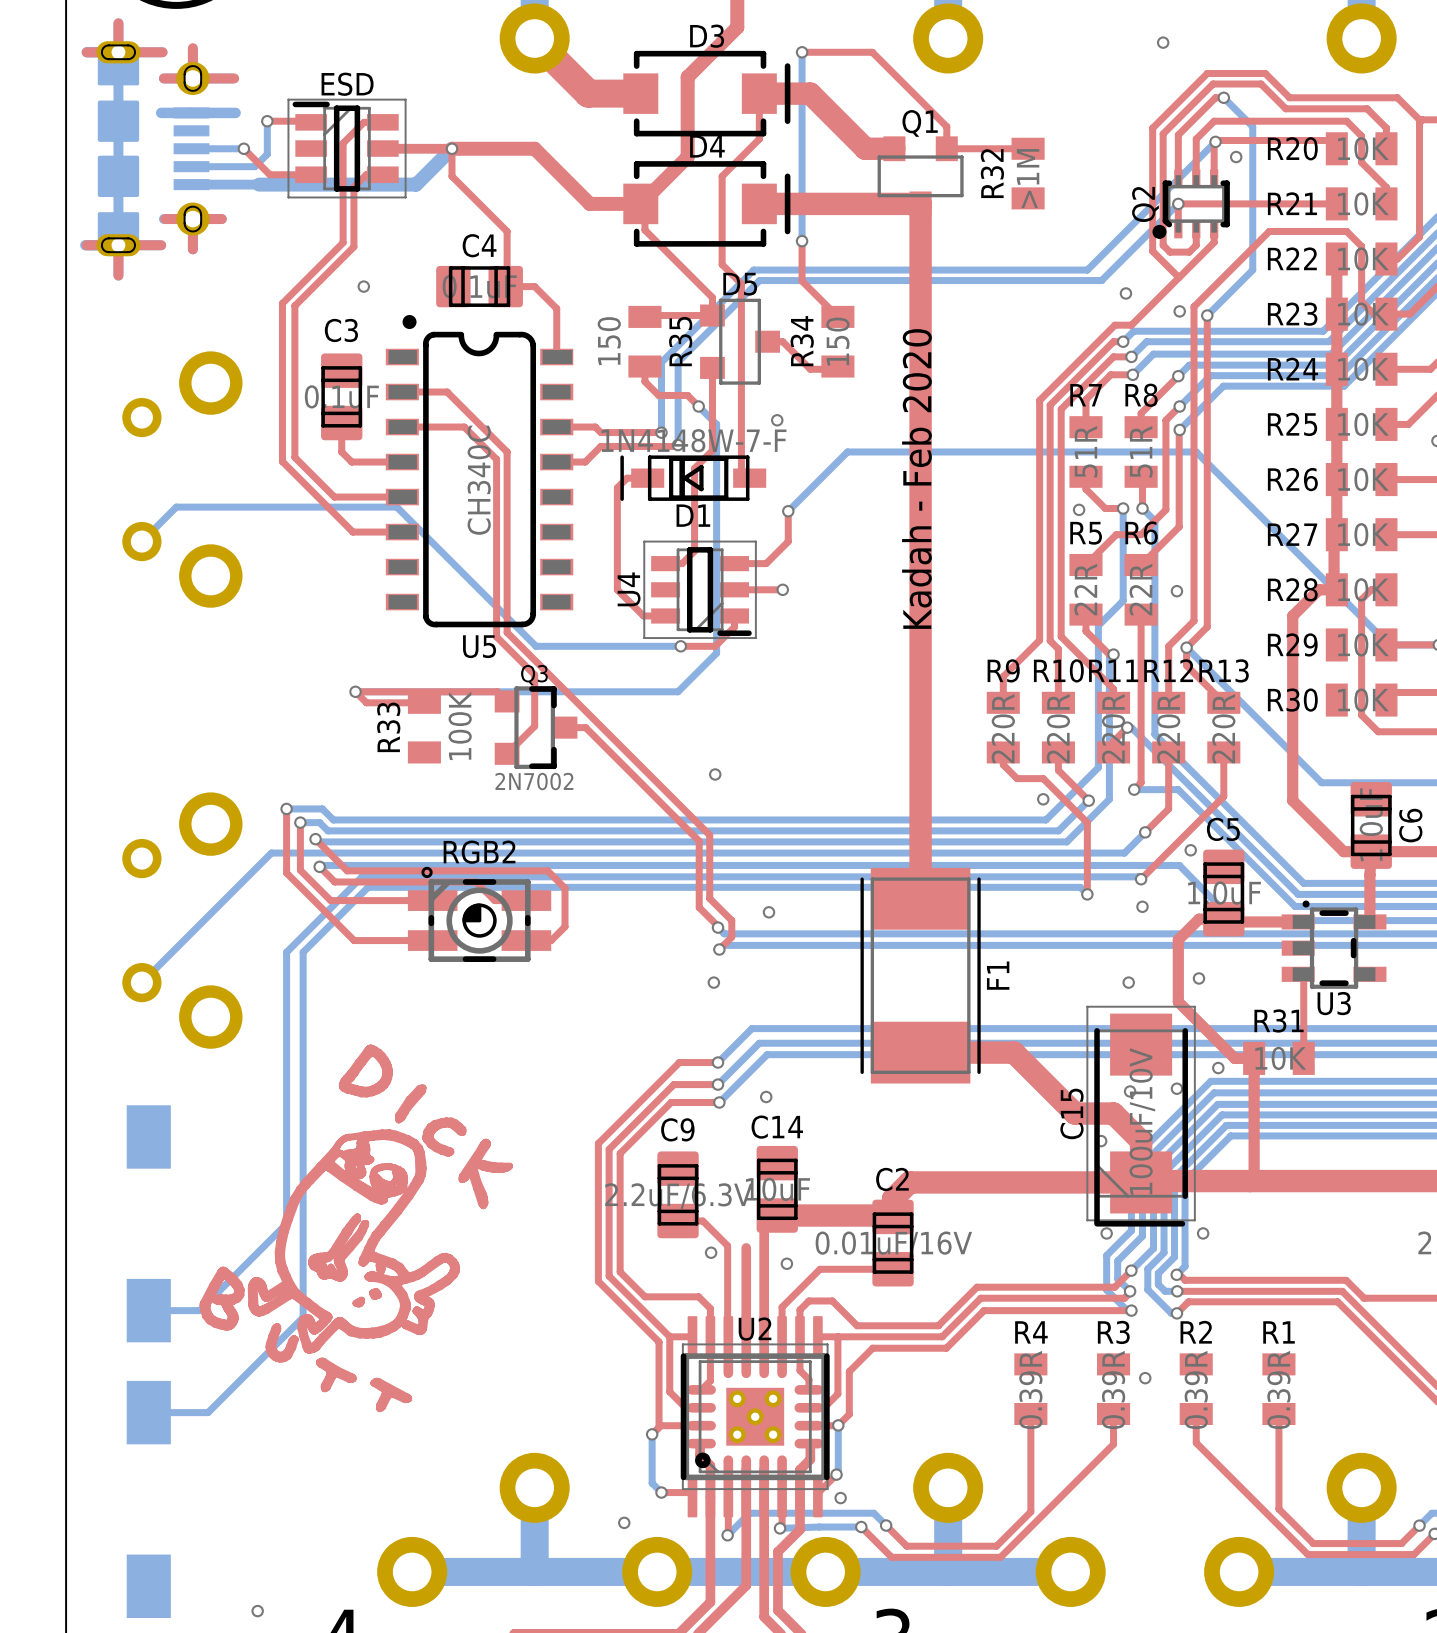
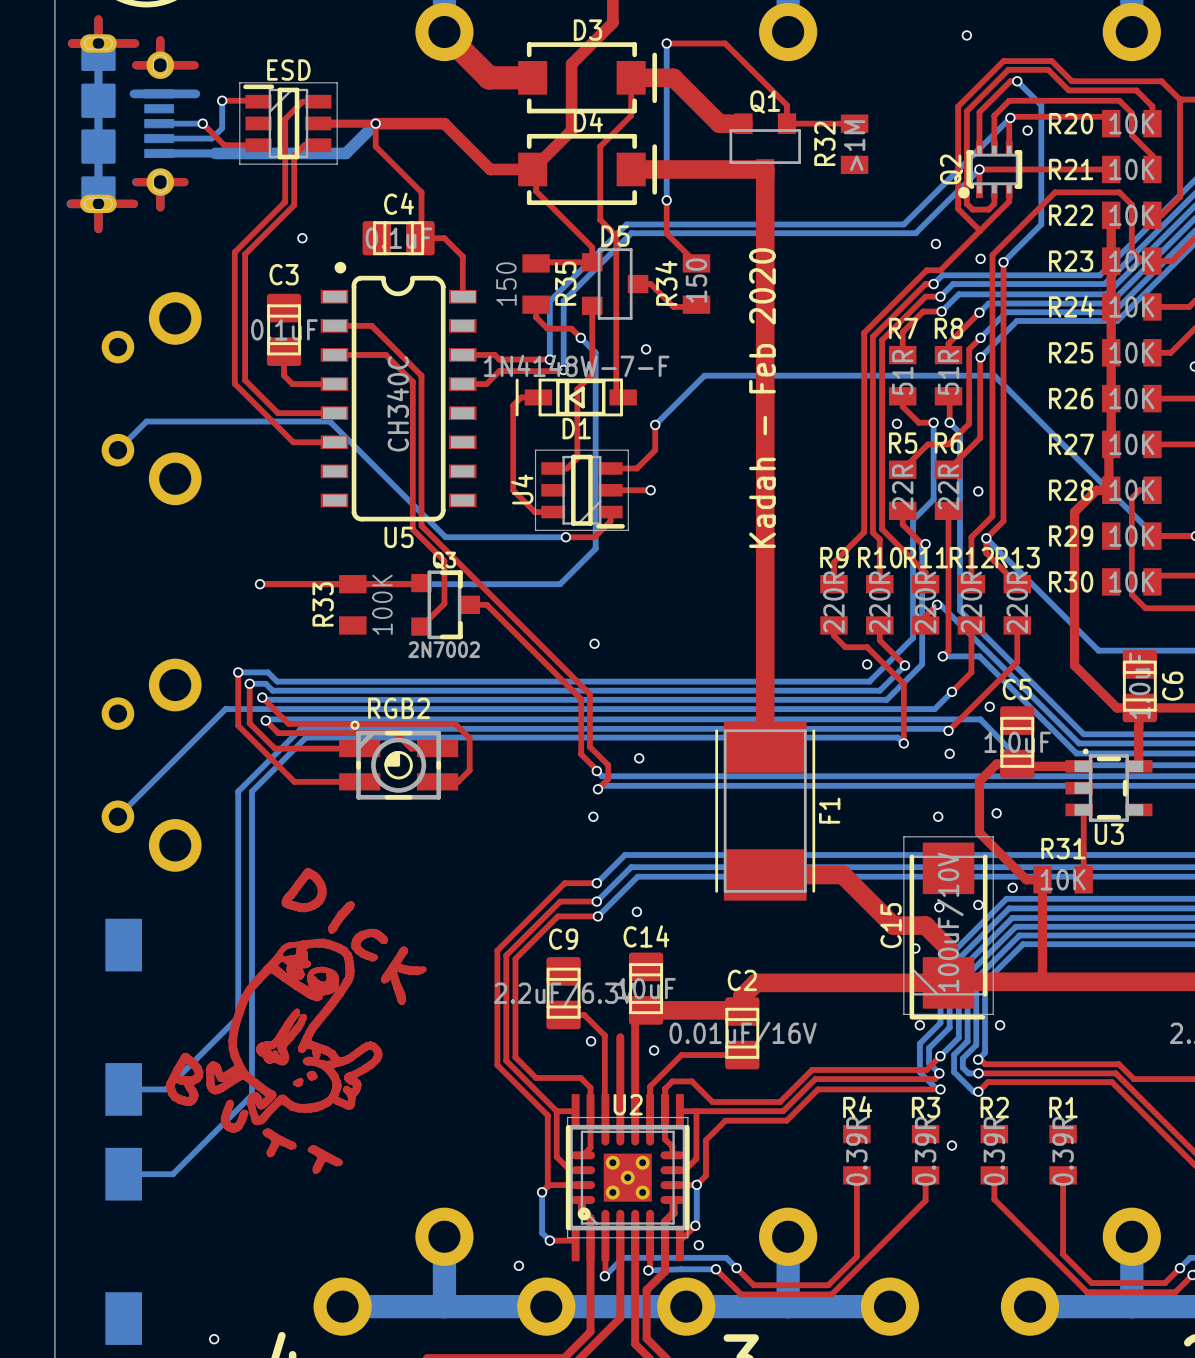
bottom track: (716, 653) (678, 691) (355, 691) -> (595, 542) (595, 548) (560, 584) (260, 584)
via position: (355, 691) -> (260, 584)
top track: (507, 701) (497, 691) (355, 691) (366, 702) -> (421, 583) (352, 584)
top track: none -> (260, 584) (304, 584)

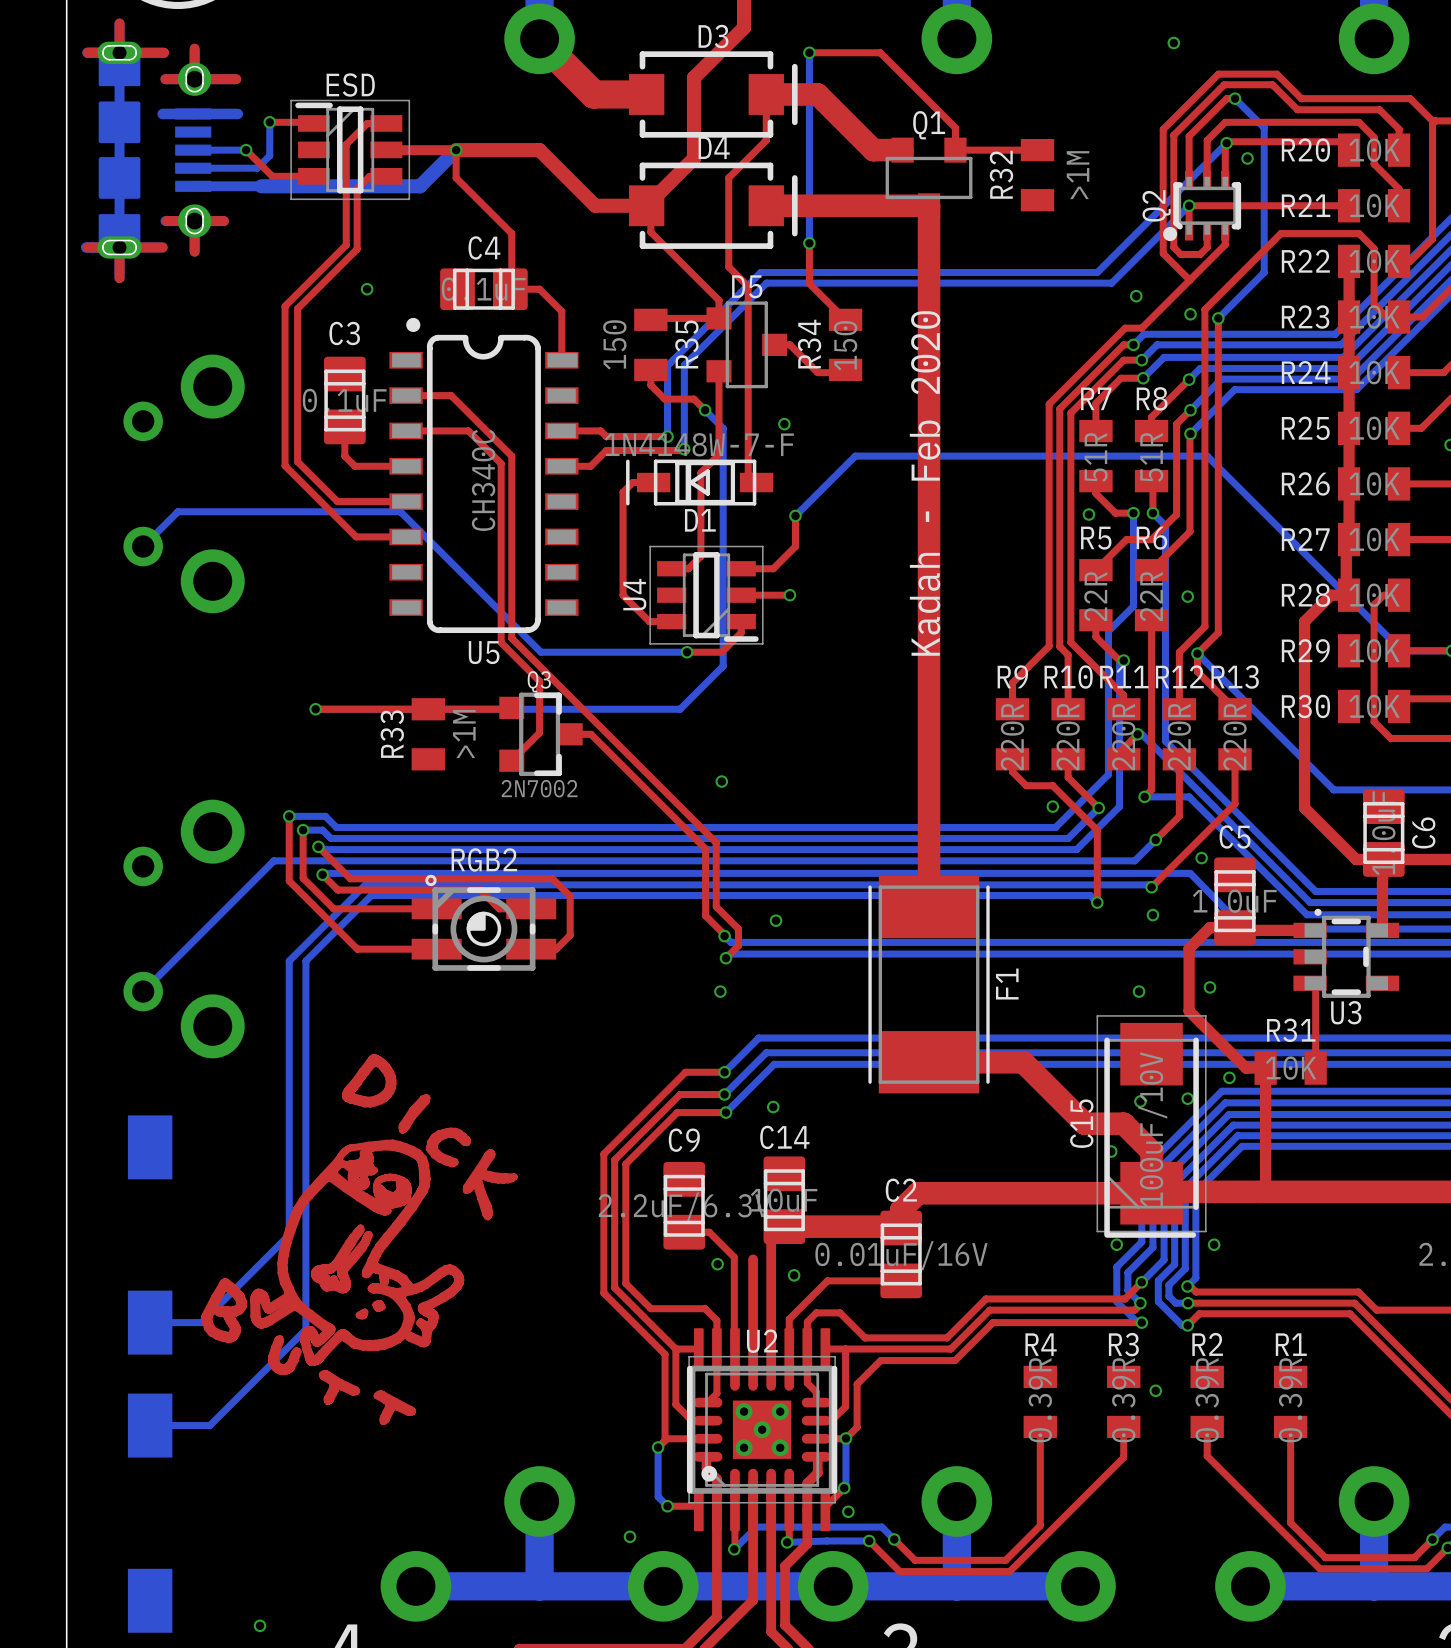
R32 value position: >1M (854, 145) -> >1M (1078, 175)
R33 value: 100K (382, 604) -> >1M (464, 734)

